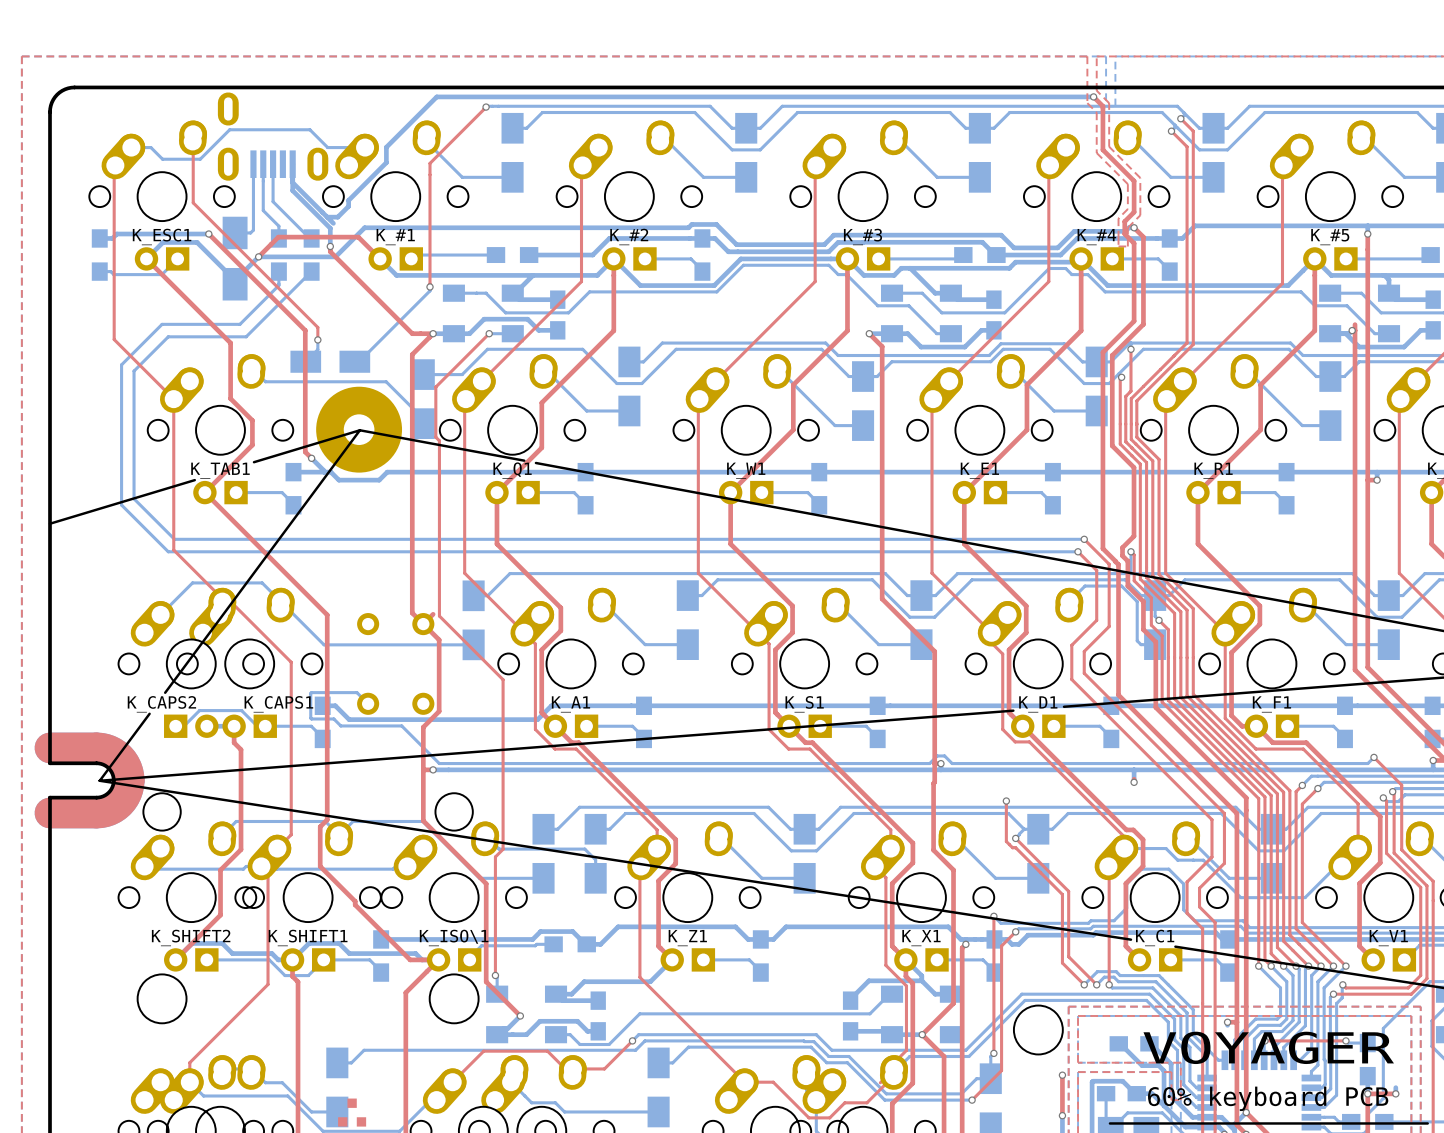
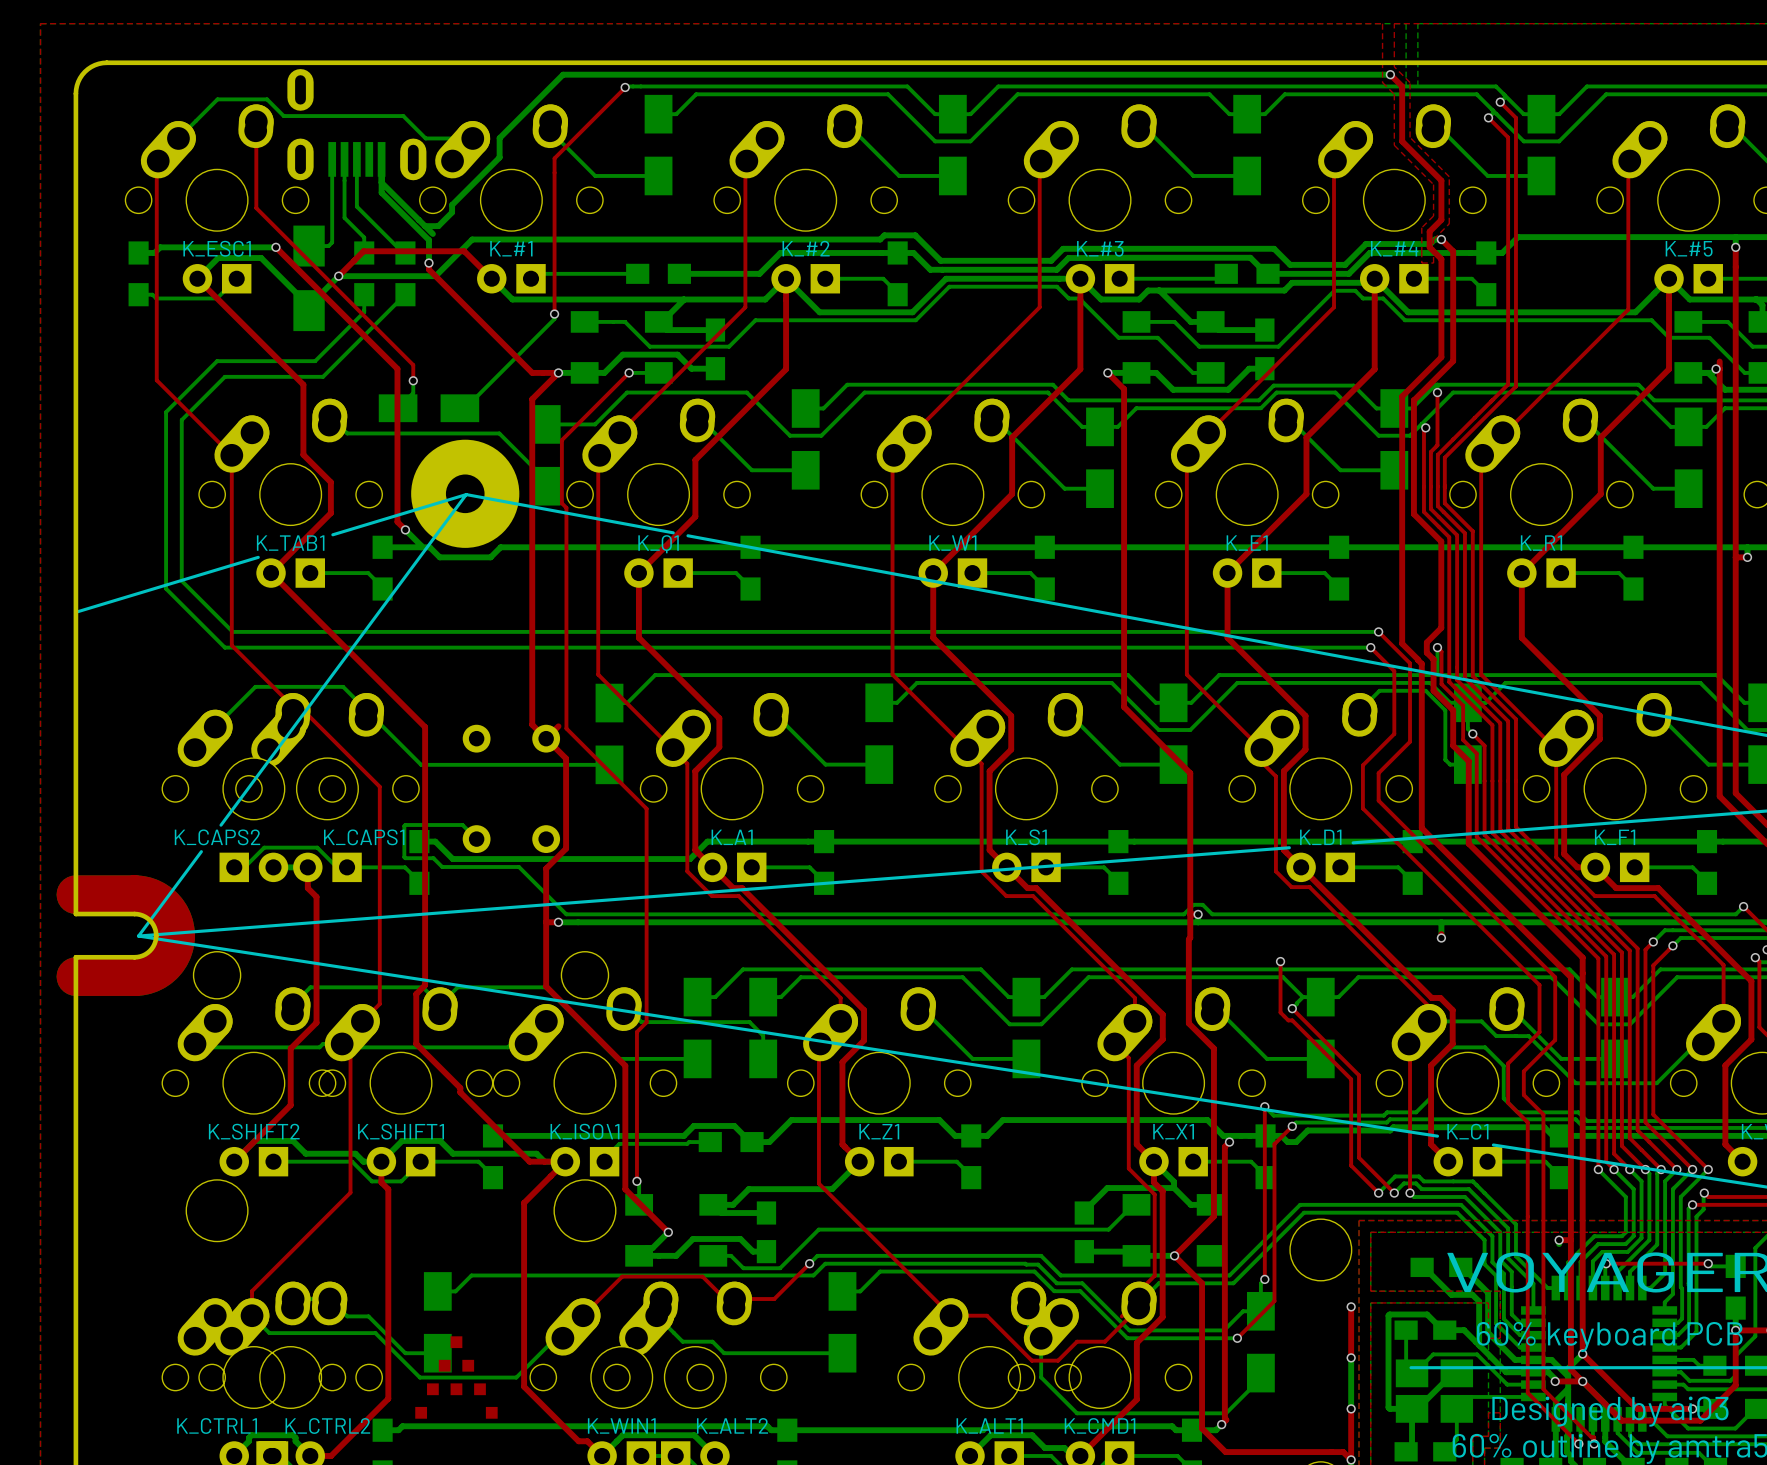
bottom track: (229, 129) (200, 159) (162, 159) (150, 147) (131, 147) -> (302, 116) (283, 116) (267, 99) (217, 99) (178, 138)

